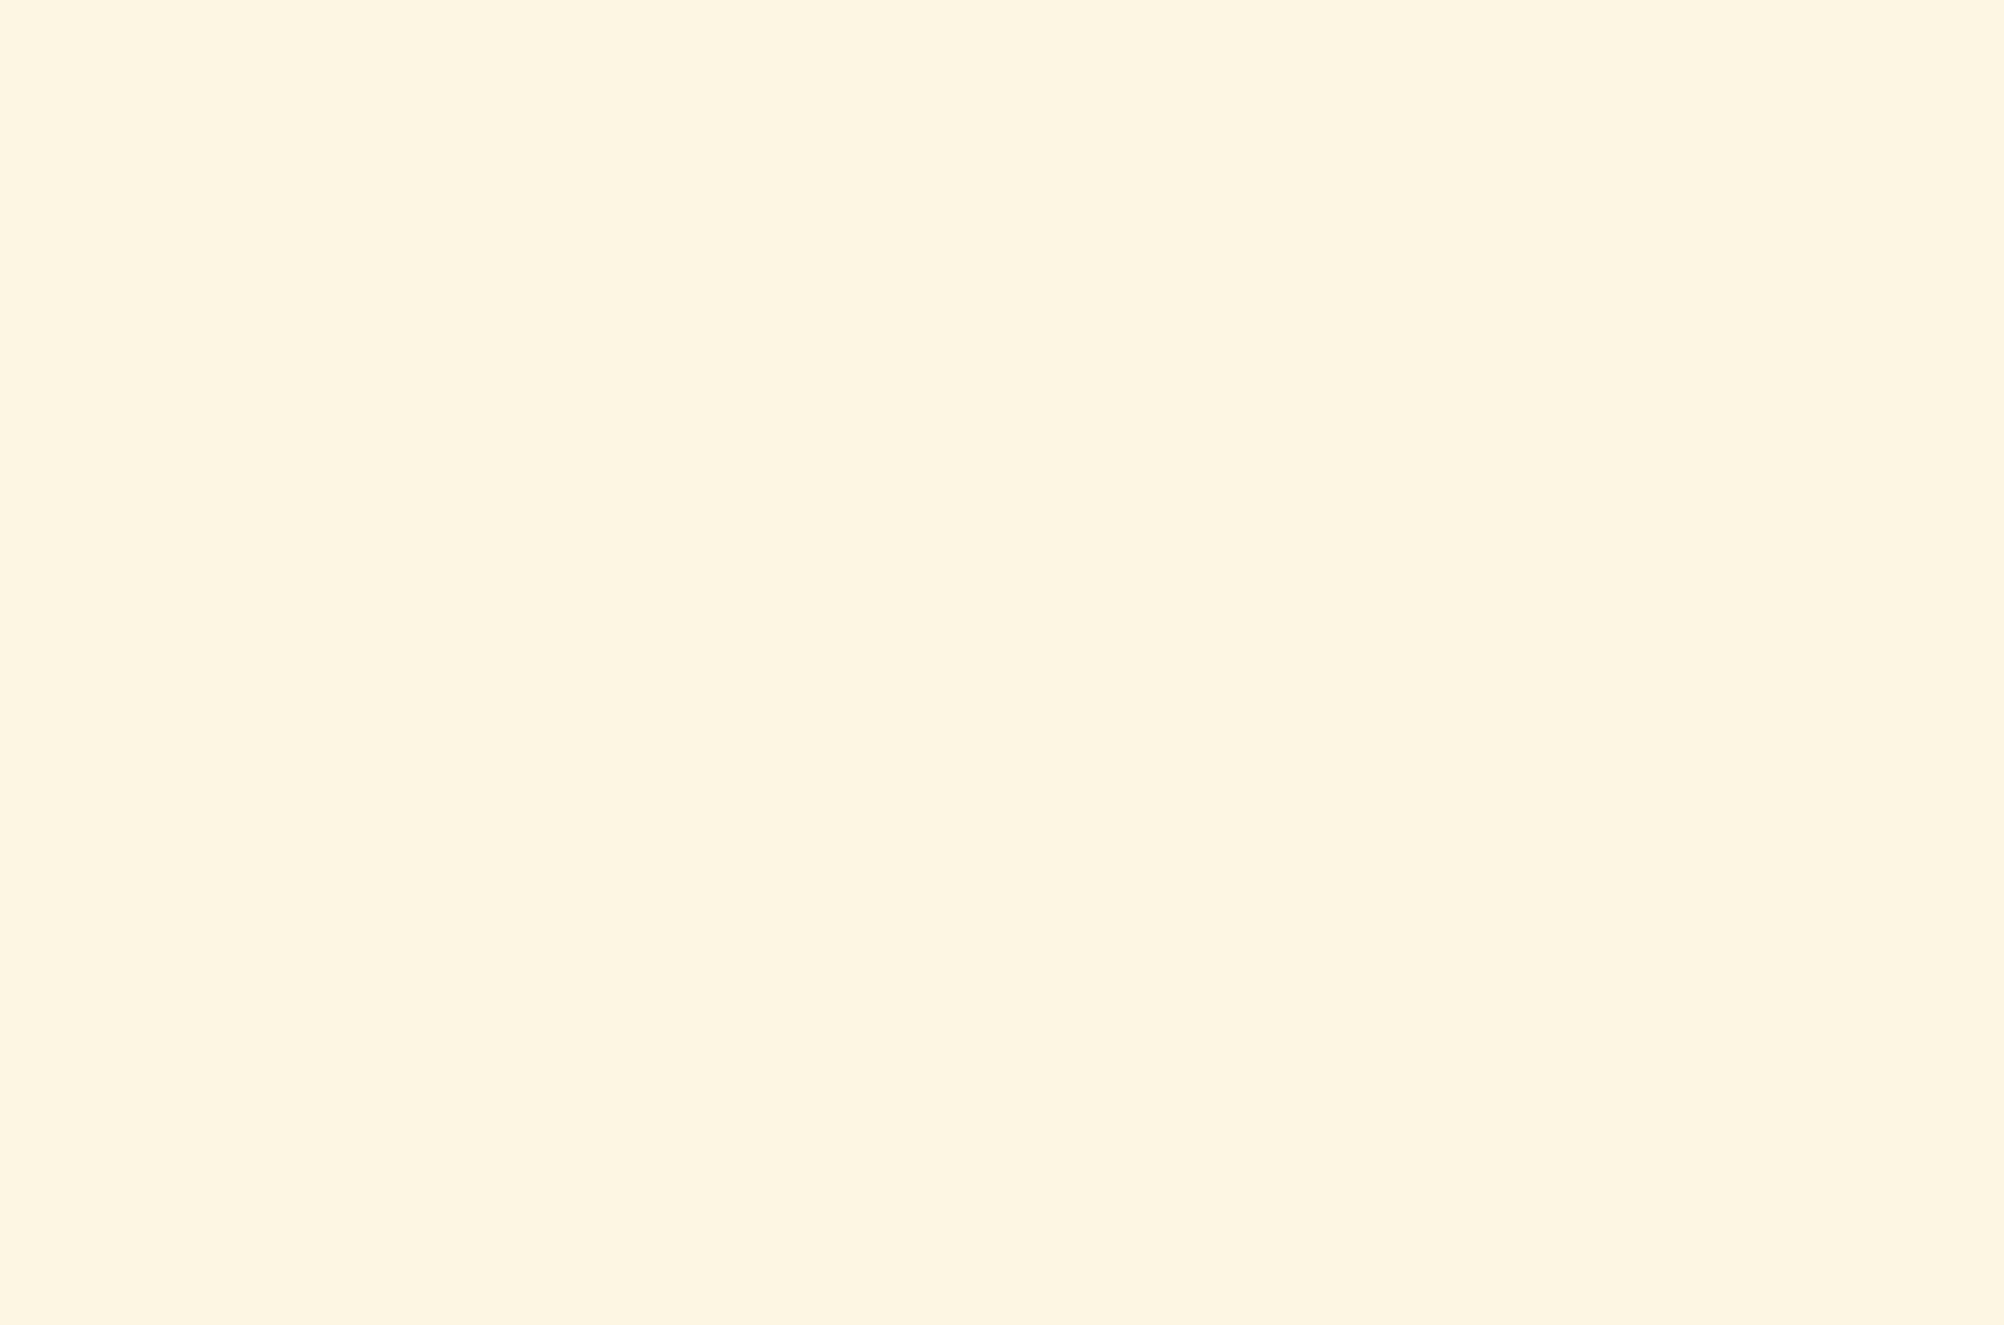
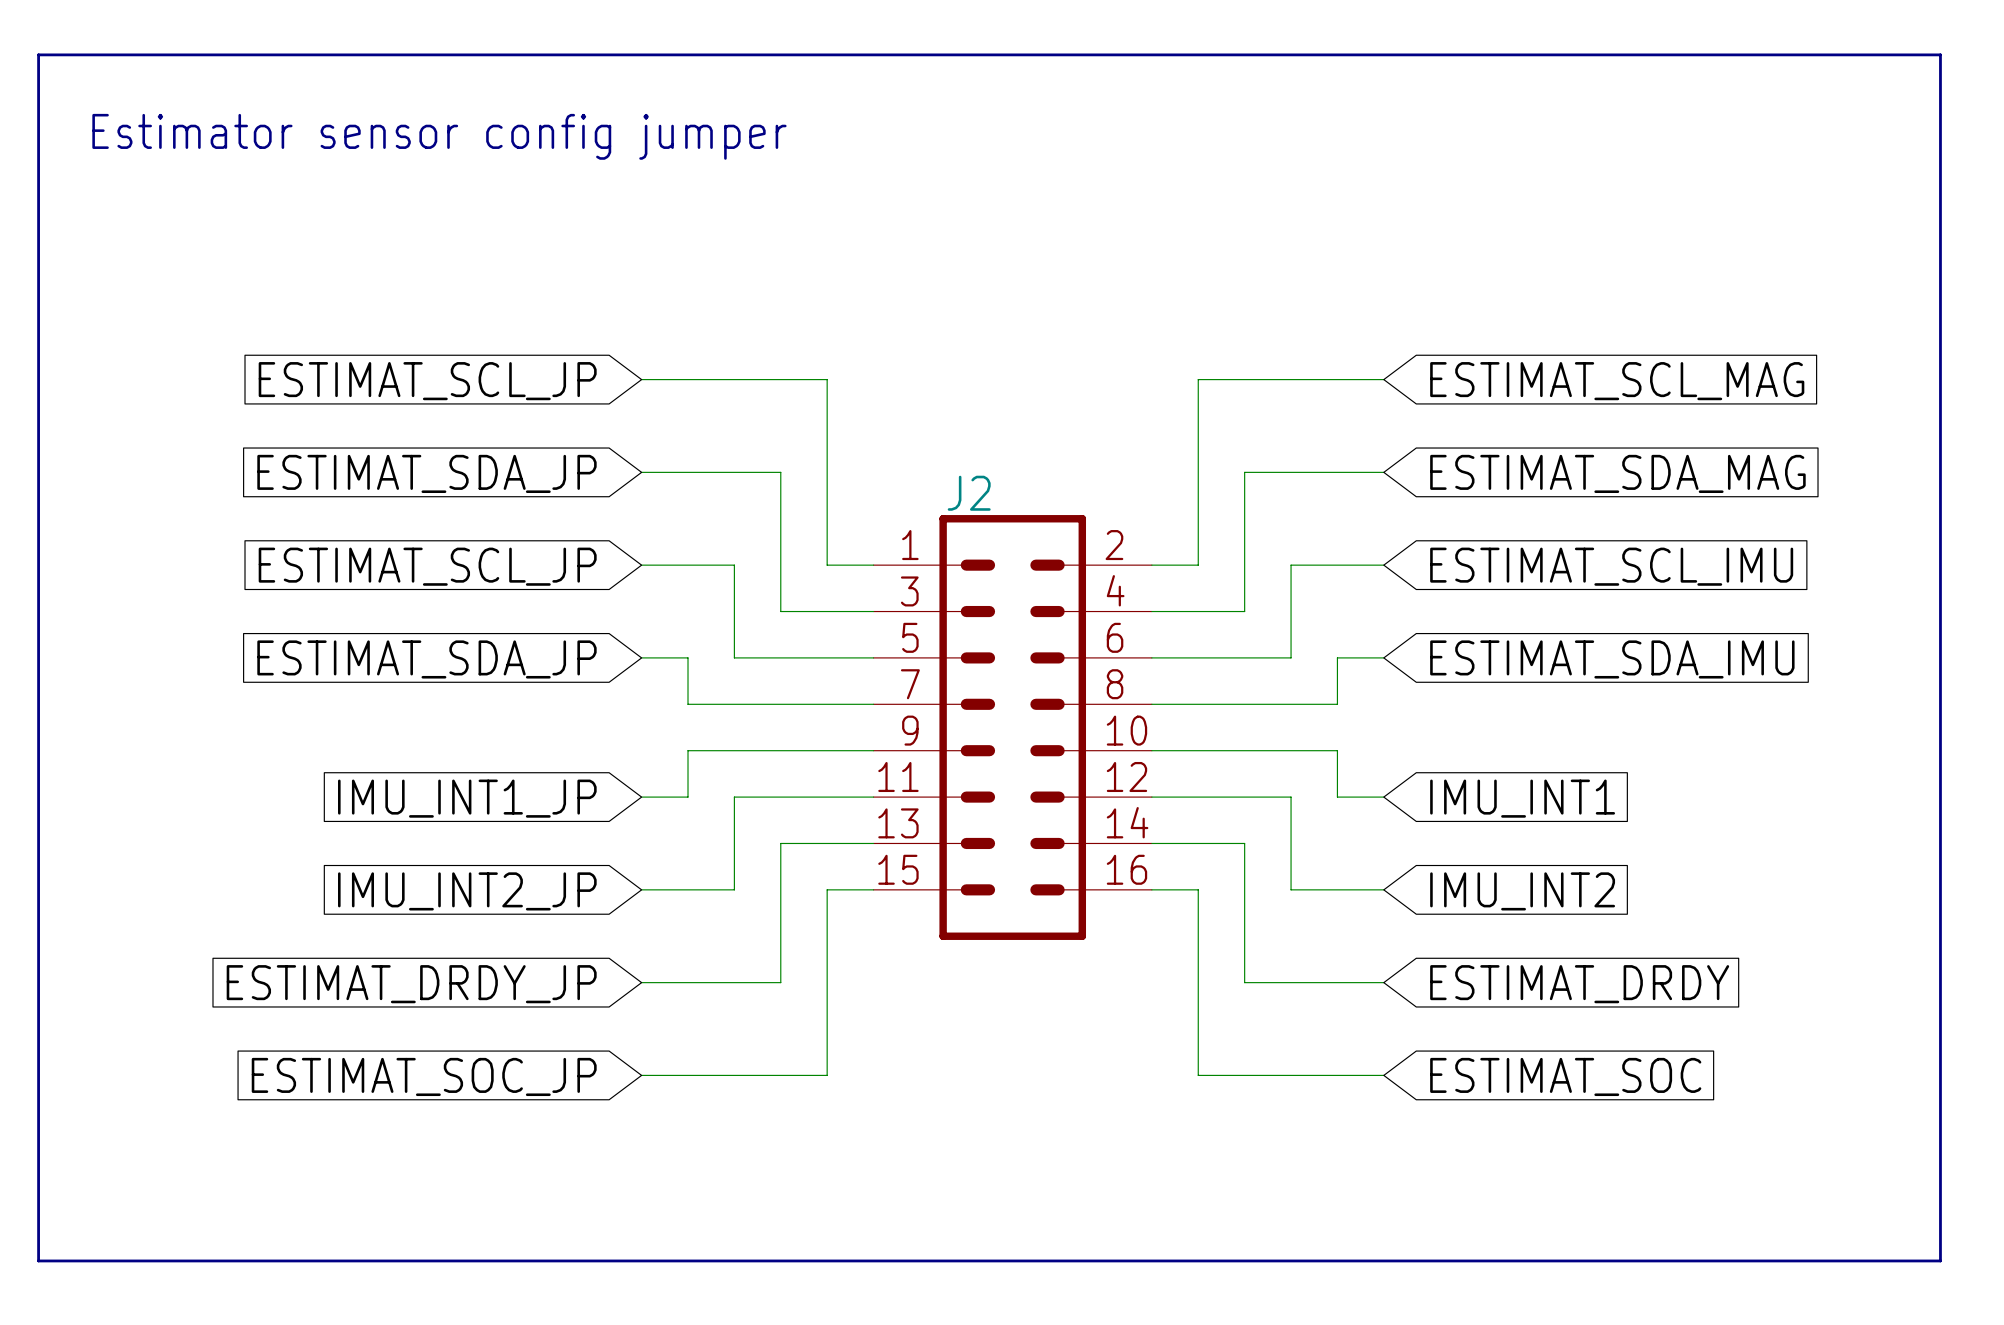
line: none -> (38, 54) (1940, 54) (1940, 1260) (38, 1260) (38, 54)
text: none -> Estimator sensor config jumper (439, 136)
wire: none -> (641, 379) (827, 379) (827, 565) (873, 565)
wire: none -> (1383, 379) (1198, 379) (1198, 565) (1151, 565)
global label: none -> ESTIMAT_SCL_JP (427, 381)
global label: none -> ESTIMAT_SCL_MAG (1617, 381)
wire: none -> (641, 472) (780, 472) (780, 611) (873, 611)
wire: none -> (1383, 472) (1244, 472) (1244, 611) (1151, 611)
global label: none -> ESTIMAT_SDA_JP (426, 473)
global label: none -> ESTIMAT_SDA_MAG (1617, 473)
wire: none -> (641, 565) (734, 565) (734, 657) (873, 657)
wire: none -> (1383, 565) (1291, 565) (1291, 657) (1151, 657)
global label: none -> ESTIMAT_SCL_JP (427, 566)
global label: none -> ESTIMAT_SCL_IMU (1611, 566)
wire: none -> (641, 657) (688, 657) (688, 704) (873, 704)
wire: none -> (1383, 657) (1337, 657) (1337, 704) (1151, 704)
global label: none -> ESTIMAT_SDA_JP (426, 659)
global label: none -> ESTIMAT_SDA_IMU (1612, 659)
J2: none -> (1012, 727)
wire: none -> (873, 750) (688, 750) (688, 797) (641, 797)
wire: none -> (1151, 750) (1337, 750) (1337, 797) (1383, 797)
wire: none -> (873, 797) (734, 797) (734, 889) (641, 889)
wire: none -> (1151, 797) (1291, 797) (1291, 889) (1383, 889)
global label: none -> IMU_INT1_JP (467, 798)
global label: none -> IMU_INT1 (1522, 798)
wire: none -> (873, 843) (780, 843) (780, 982) (641, 982)
wire: none -> (1151, 843) (1244, 843) (1244, 982) (1383, 982)
wire: none -> (873, 889) (827, 889) (827, 1075) (641, 1075)
wire: none -> (1151, 889) (1198, 889) (1198, 1075) (1383, 1075)
global label: none -> IMU_INT2_JP (467, 891)
global label: none -> IMU_INT2 (1522, 891)
global label: none -> ESTIMAT_DRDY_JP (411, 984)
global label: none -> ESTIMAT_DRDY (1579, 984)
global label: none -> ESTIMAT_SOC_JP (424, 1076)
global label: none -> ESTIMAT_SOC (1565, 1076)

